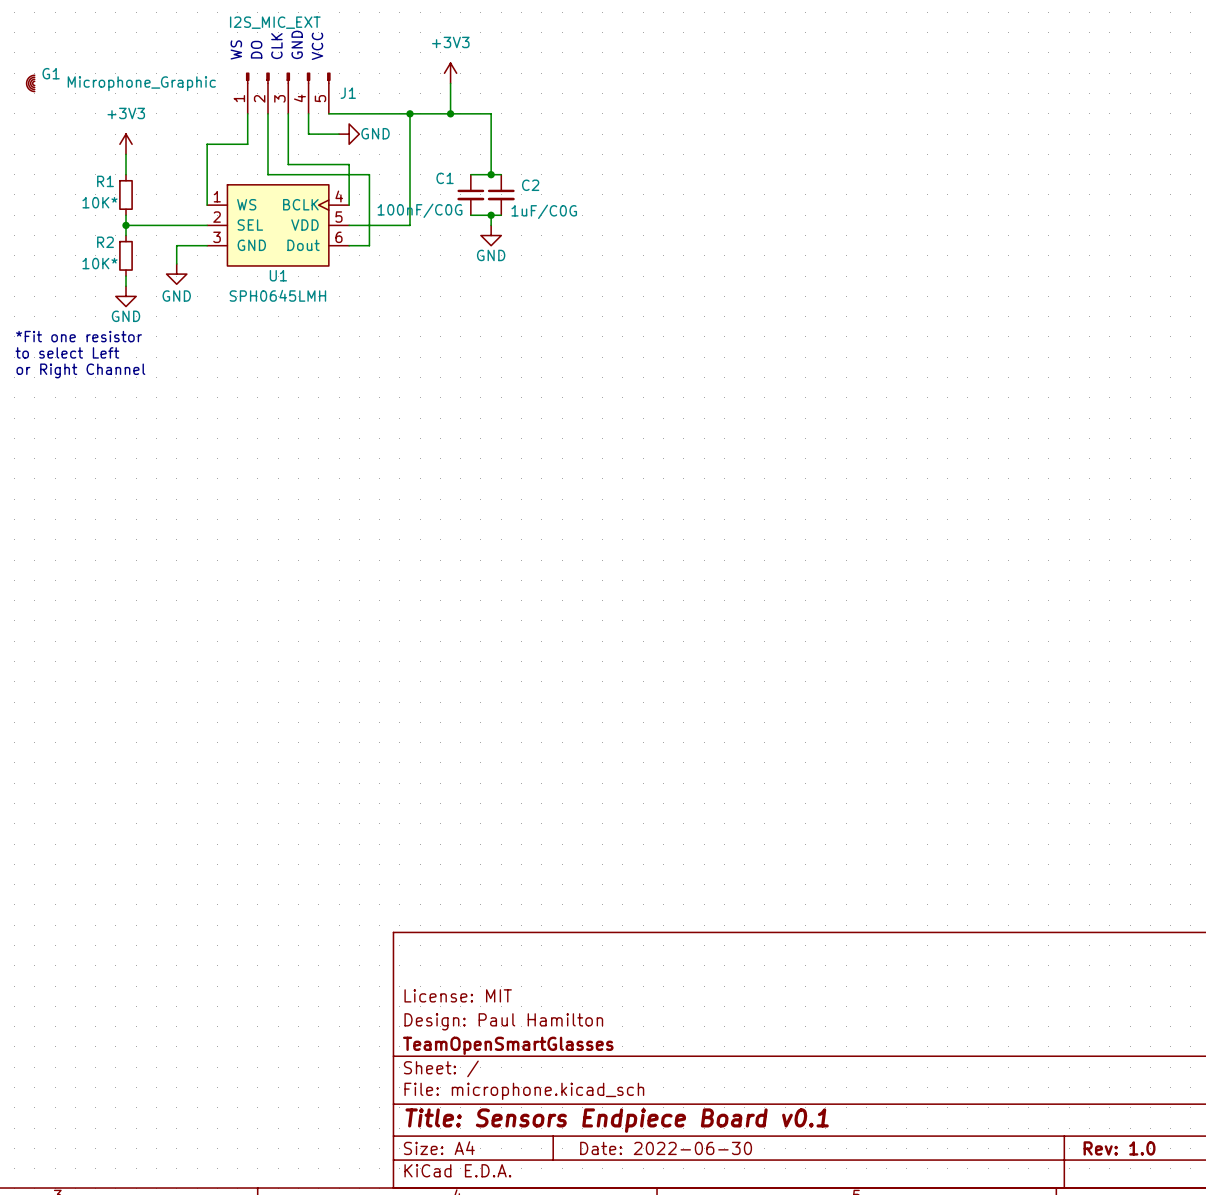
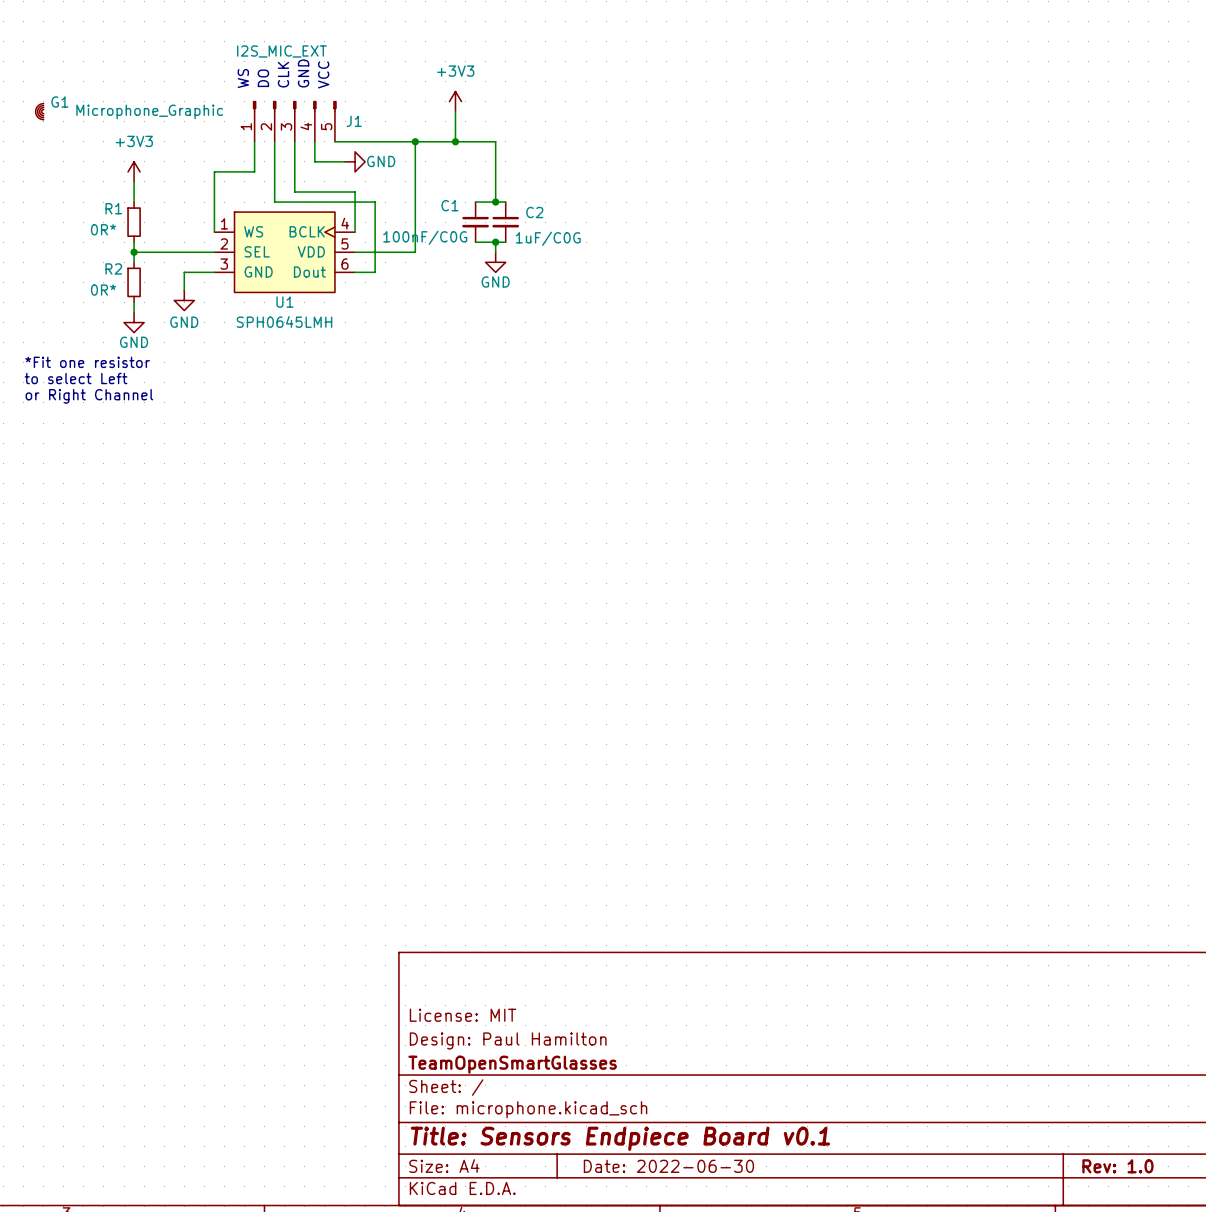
R1 value: 10K* (99, 202) -> 0R* (103, 229)
R2 value: 10K* (99, 263) -> 0R* (103, 290)

